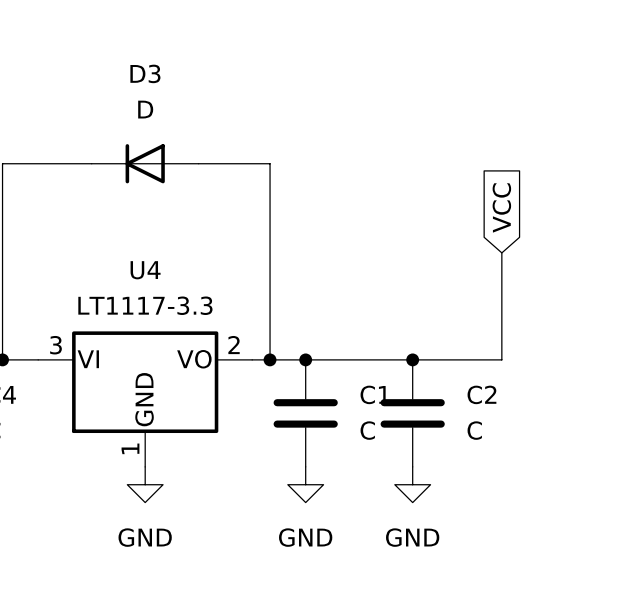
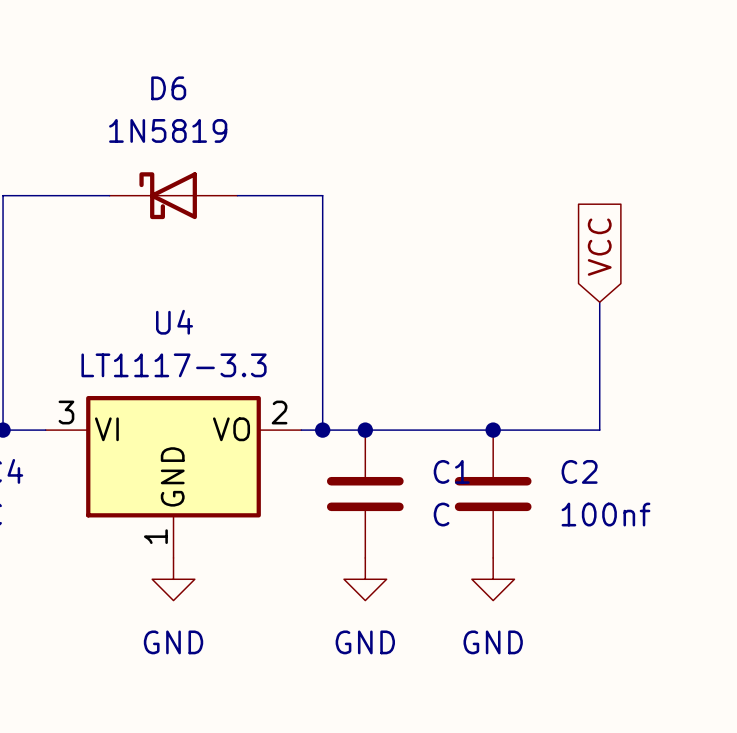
D3: D (145, 163) -> none
D6: none -> 1N5819 (173, 195)
C2 value: C (474, 430) -> 100nf (605, 514)

